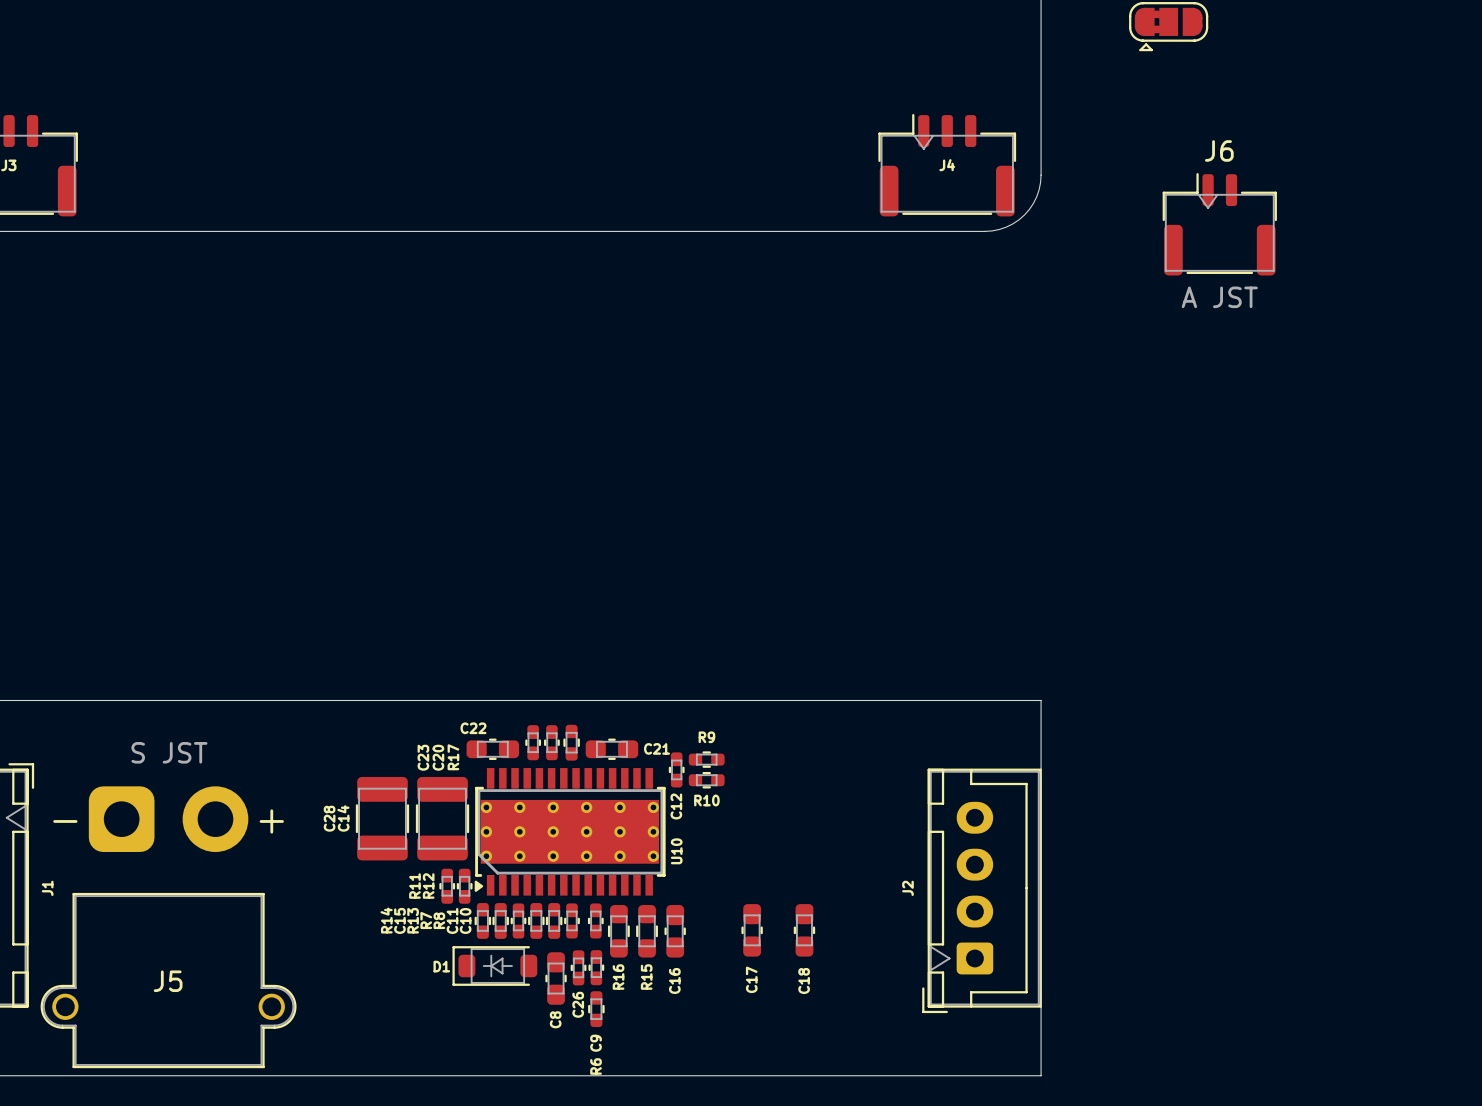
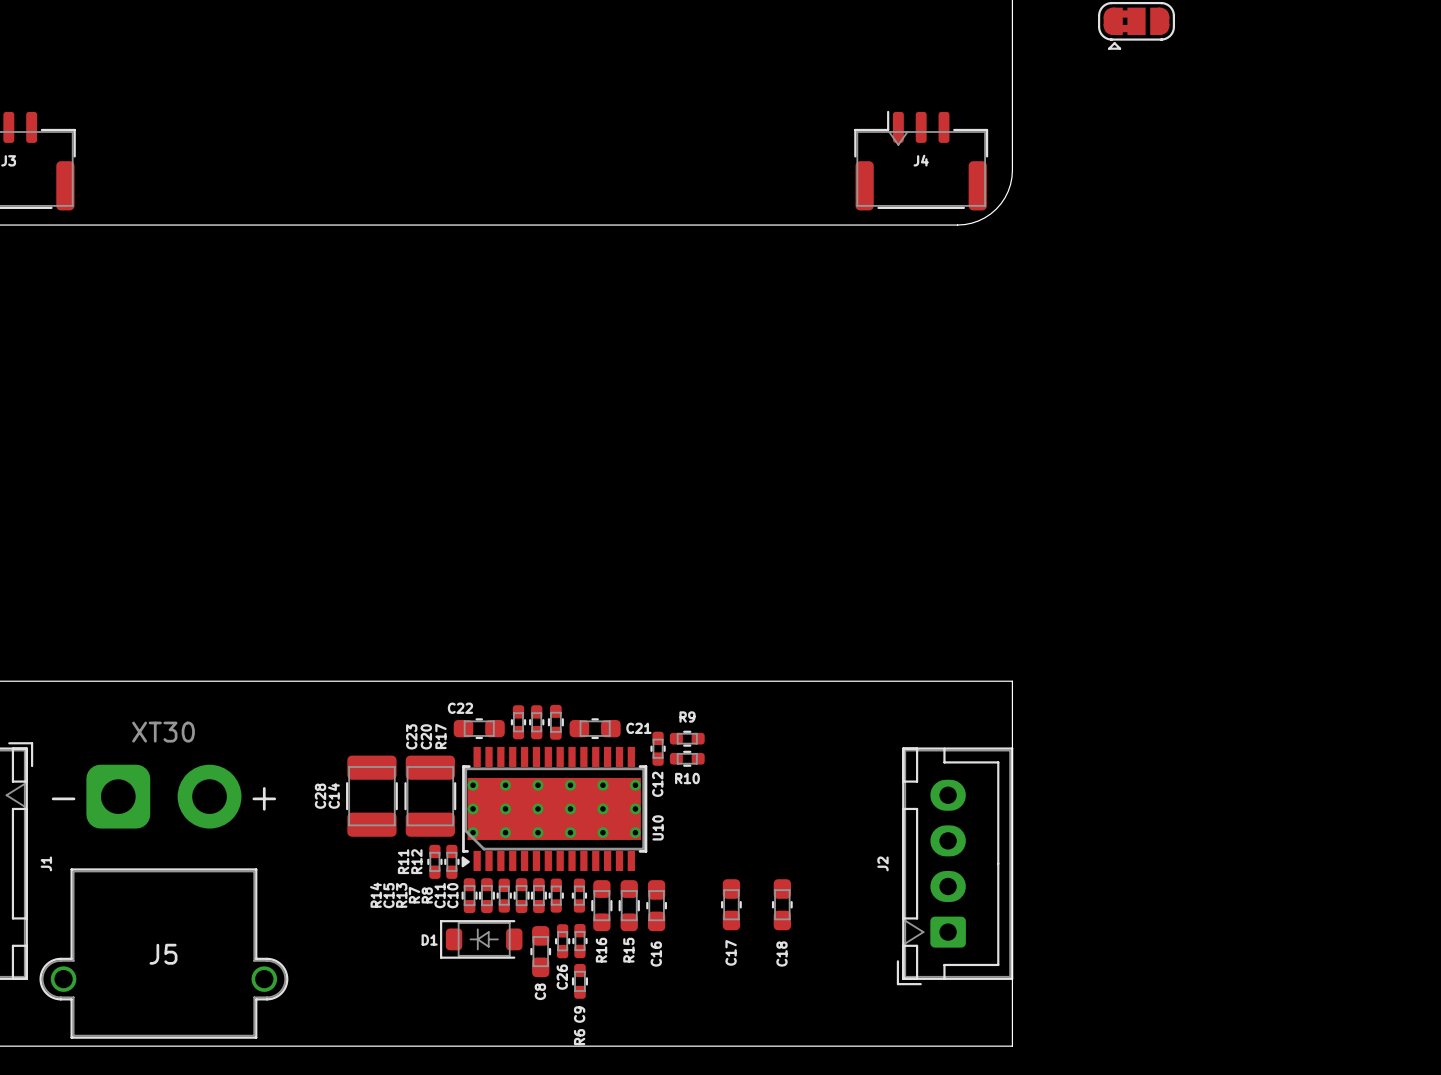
J6: A JST (1219, 224) -> none
J5 value: S JST (169, 752) -> XT30 (163, 732)

